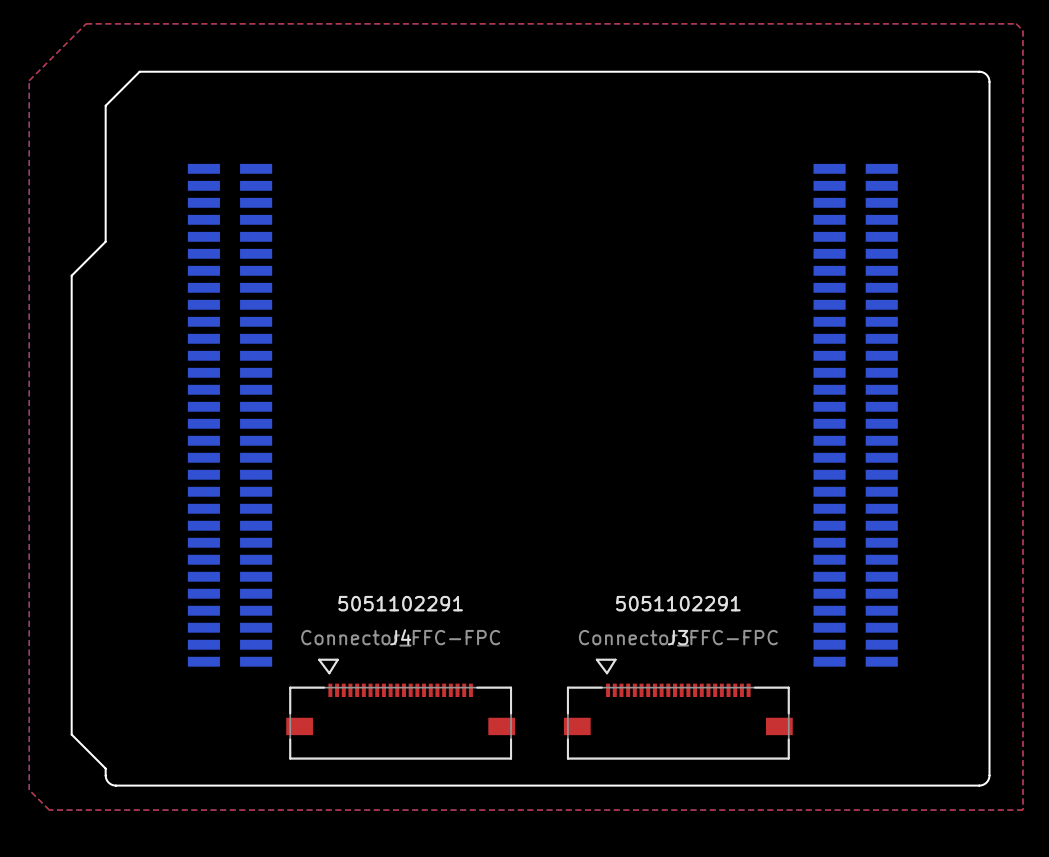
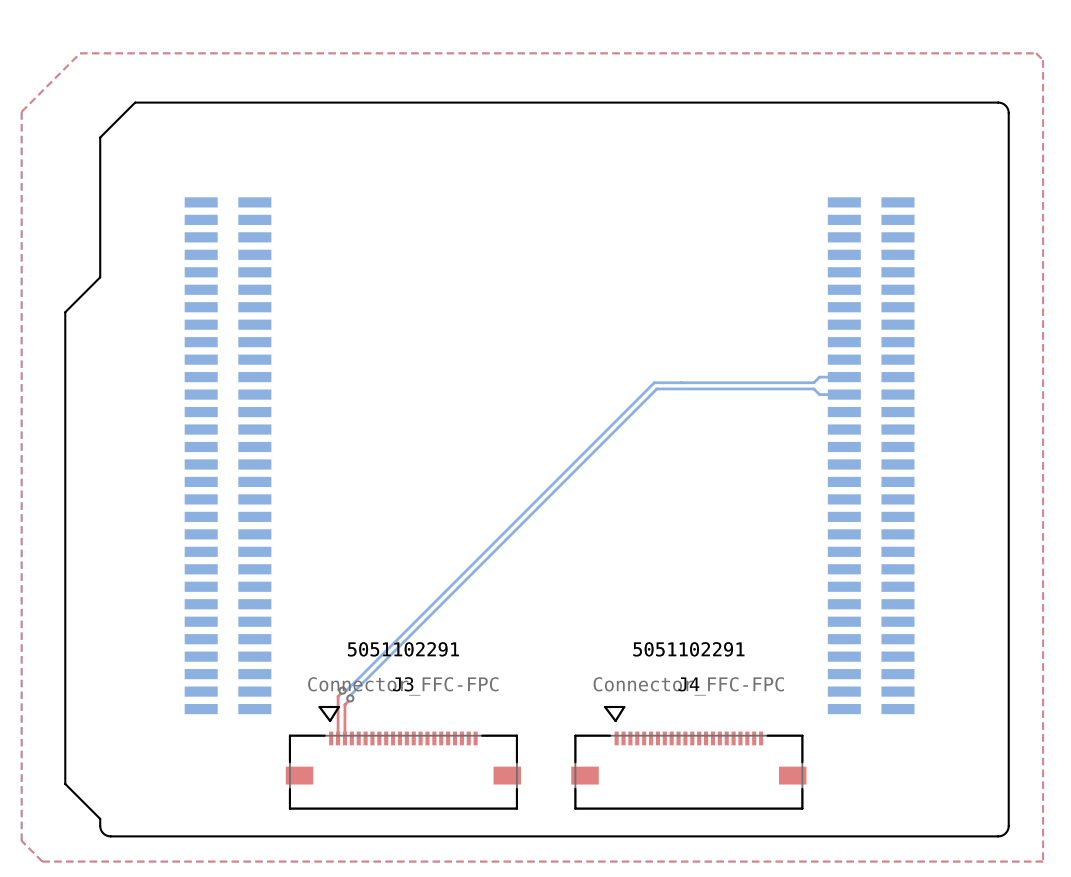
bottom track: none -> (844, 377) (819, 377) (813, 382) (654, 382) (346, 690) (342, 690)
bottom track: none -> (844, 394) (819, 394) (813, 388) (656, 388) (350, 695) (350, 698)
J4 name: J4 (400, 637) -> J3 (403, 684)
J3 name: J3 (678, 637) -> J4 (688, 684)
top track: none -> (342, 690) (338, 696) (338, 738)
via: none -> (342, 690)
top track: none -> (350, 698) (344, 704) (344, 738)
via: none -> (350, 698)

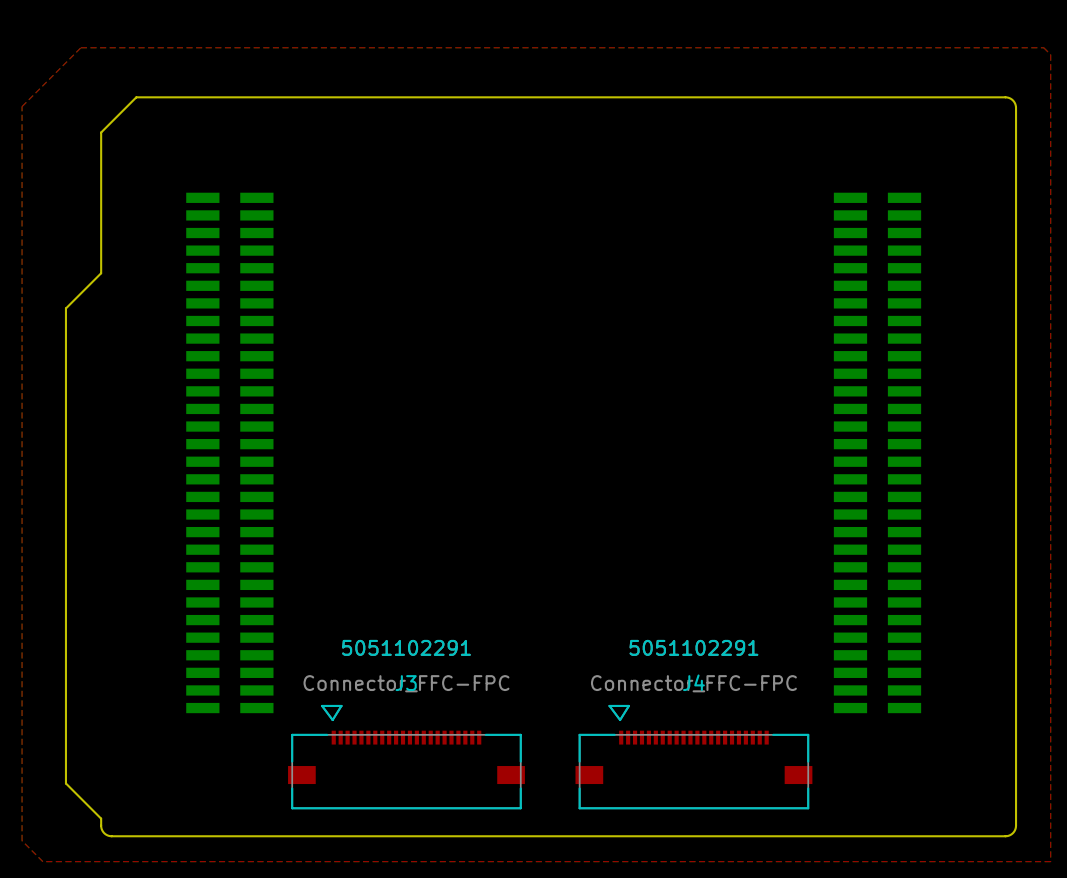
bottom track: (844, 377) (819, 377) (813, 382) (654, 382) (346, 690) (342, 690) -> none
bottom track: (844, 394) (819, 394) (813, 388) (656, 388) (350, 695) (350, 698) -> none
top track: (342, 690) (338, 696) (338, 738) -> none
via: (342, 690) -> none
top track: (350, 698) (344, 704) (344, 738) -> none
via: (350, 698) -> none

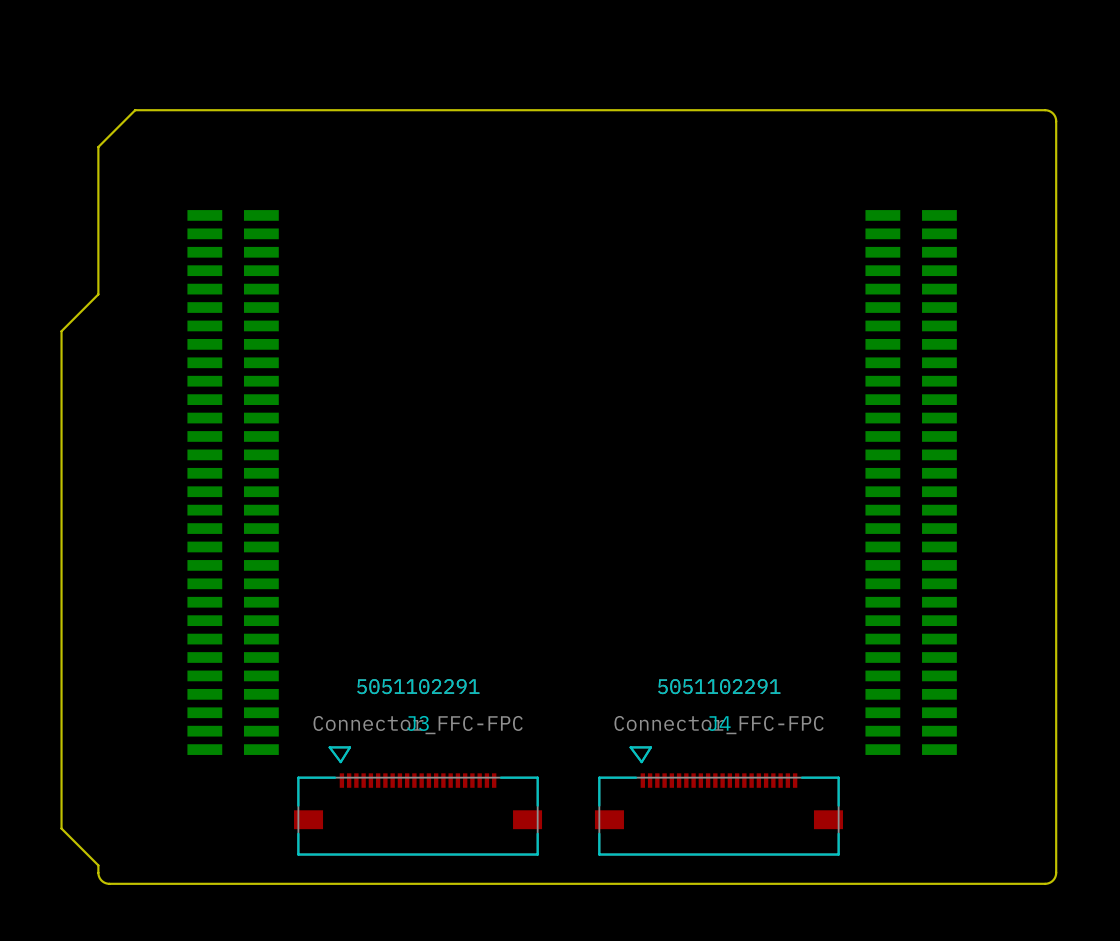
top zone outline: (80, 47) (22, 106) (22, 840) (42, 861) (1050, 861) (1050, 54) (1043, 47) (80, 47) -> none

